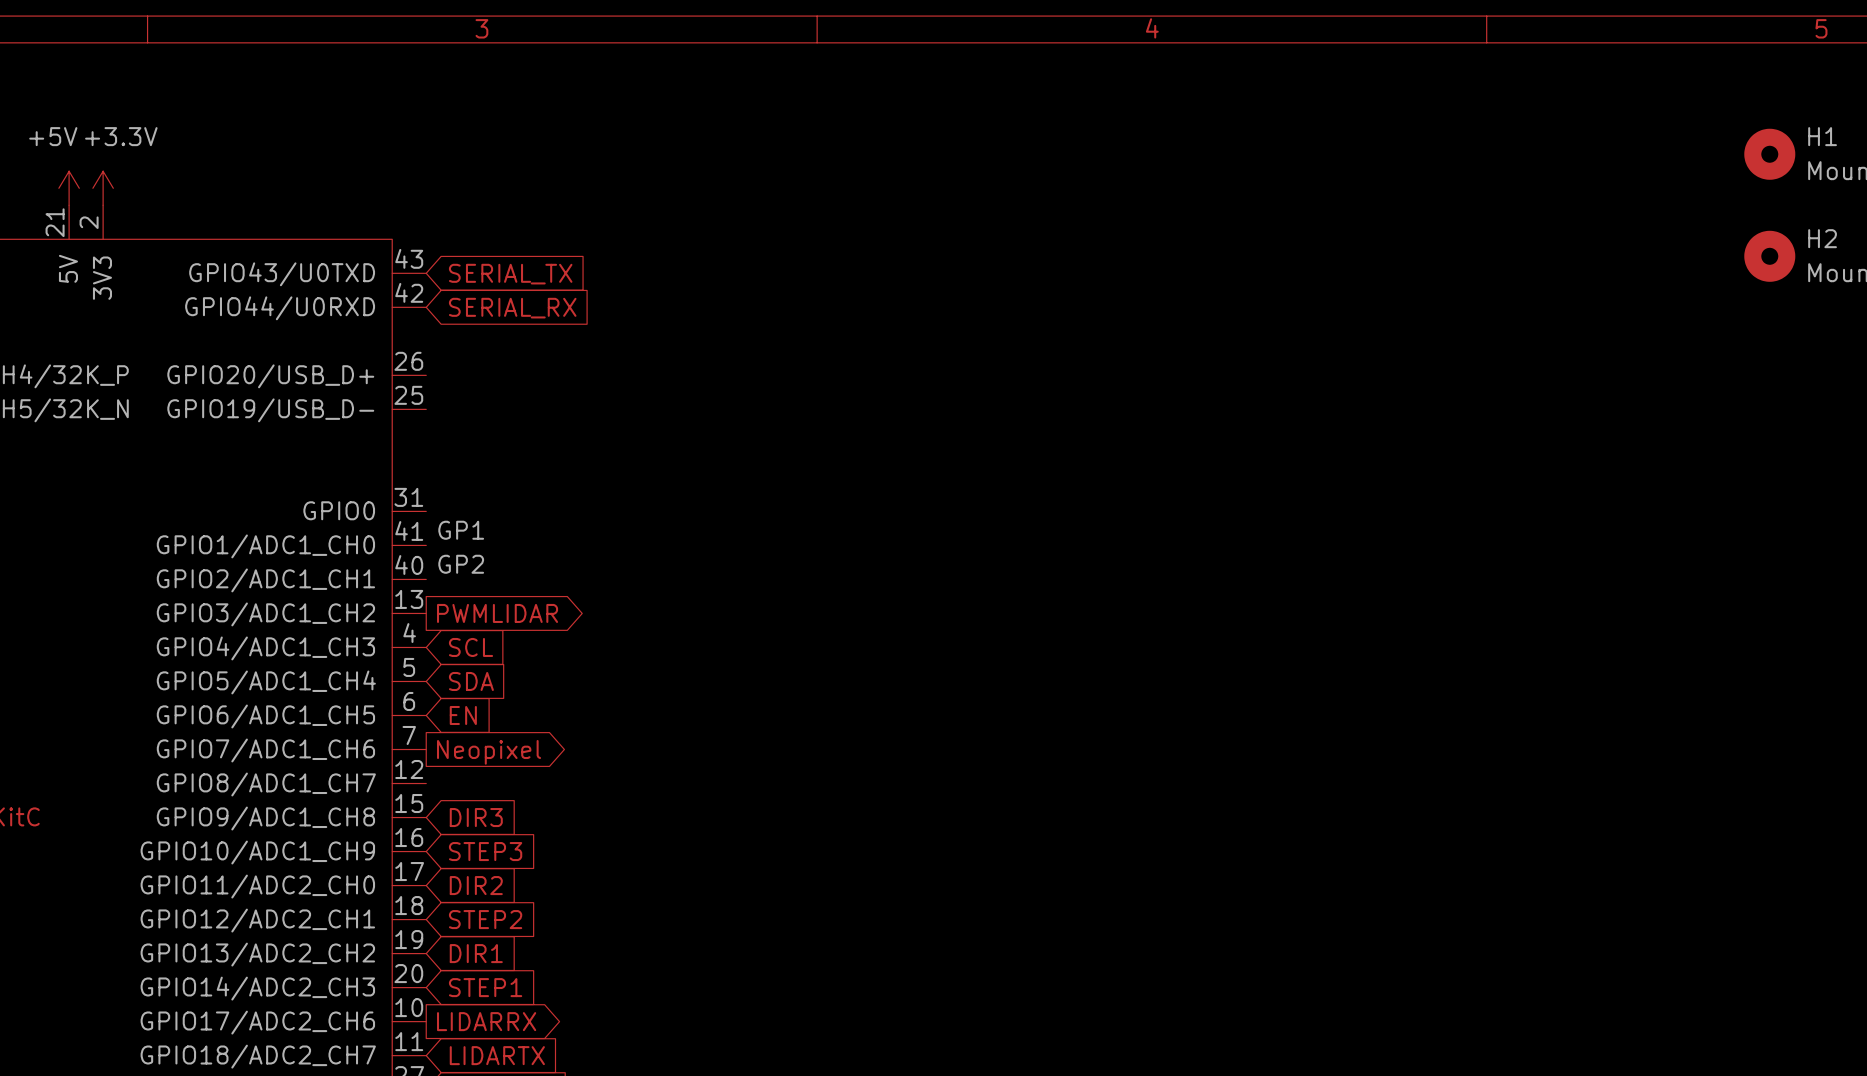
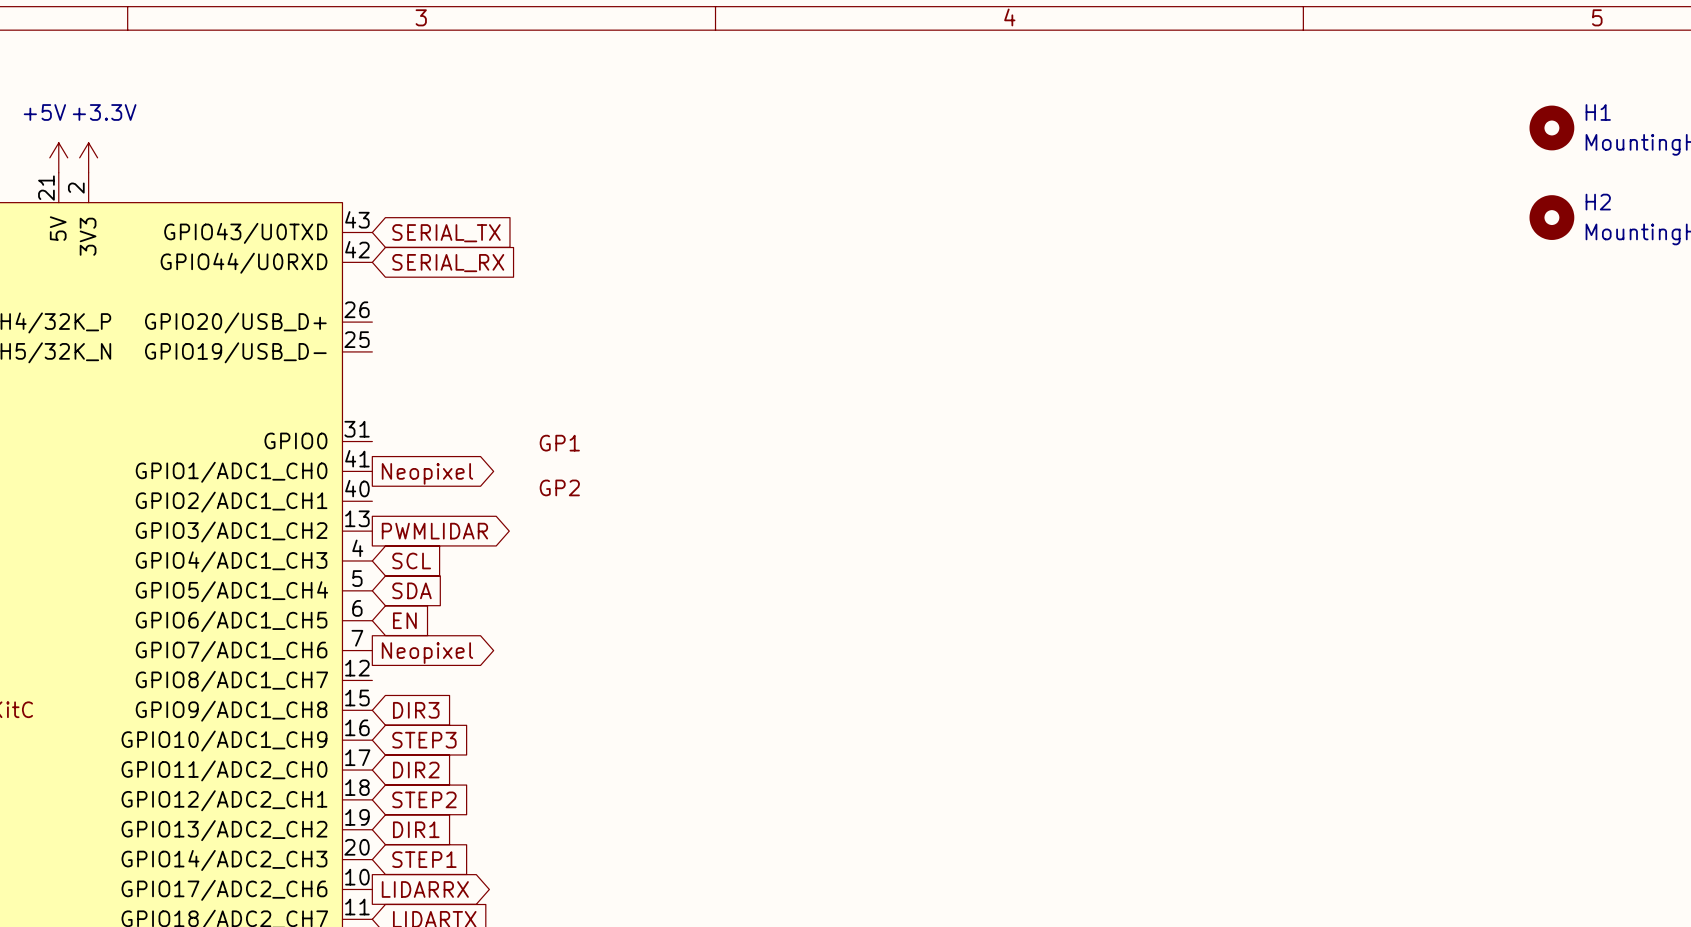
label position: GP1 (461, 530) -> GP1 (559, 443)
global label: none -> Neopixel (427, 473)
label position: GP2 (461, 564) -> GP2 (559, 487)

